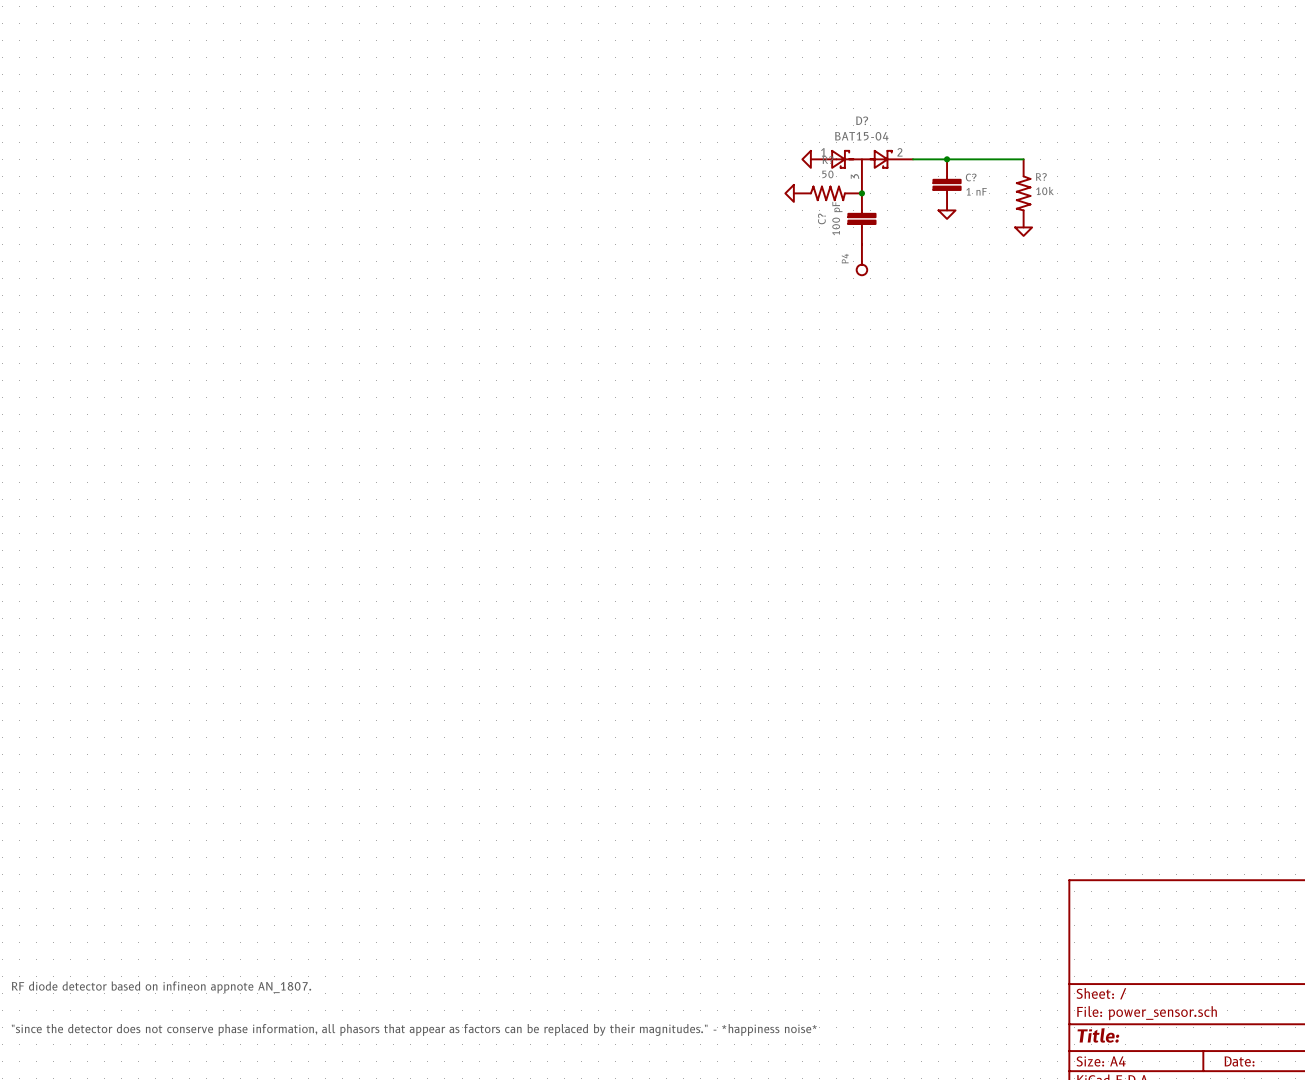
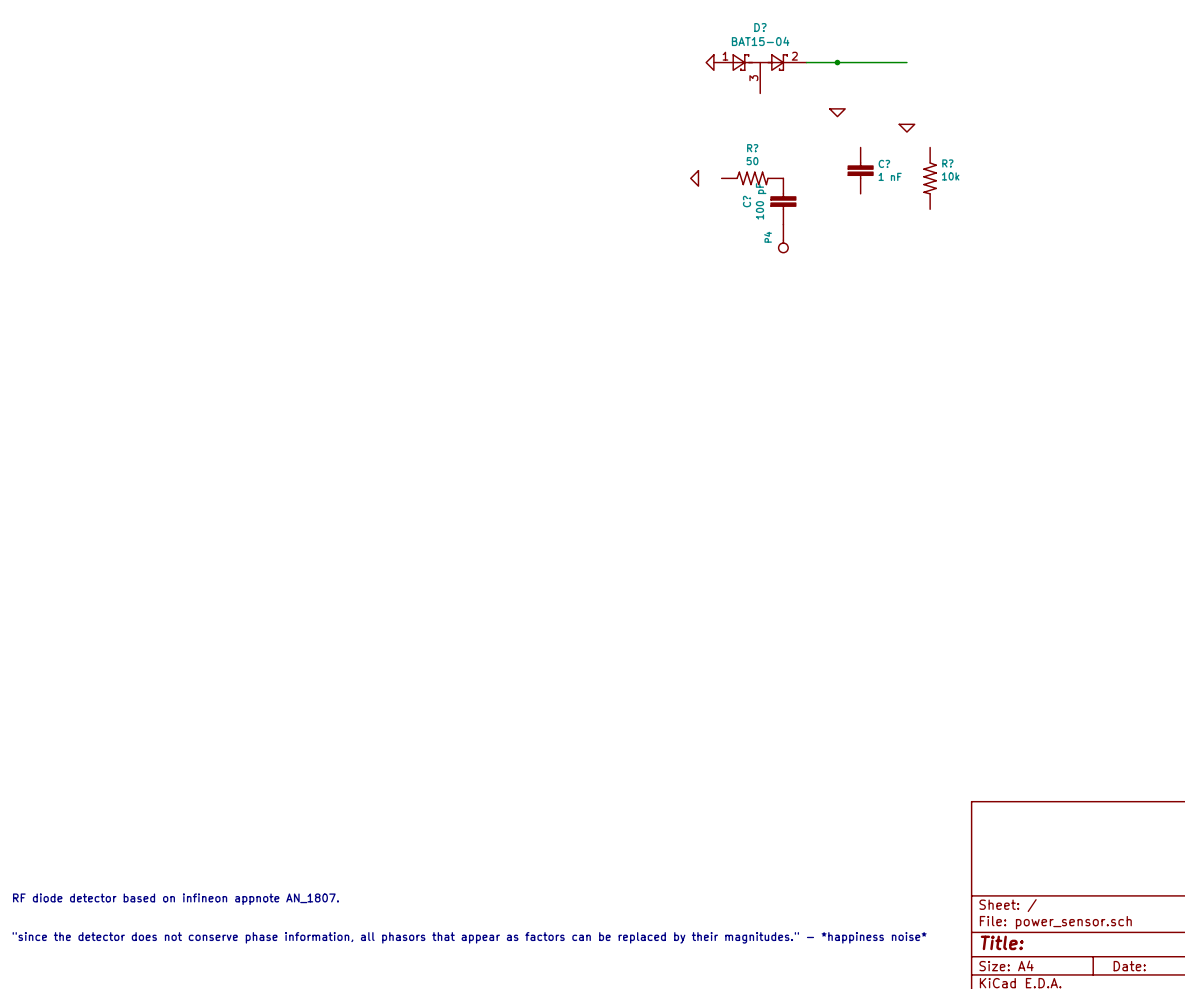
power symbol: none -> (710, 62)
junction: none -> (837, 62)
power symbol: none -> (837, 112)
power symbol: none -> (906, 128)
power symbol: (806, 159) -> none
wire: (913, 159) (1023, 159) -> (806, 62) (906, 62)
junction: (947, 159) -> none
D? position: (861, 172) -> (760, 74)
power symbol position: (789, 193) -> (694, 178)
junction: (861, 193) -> none
power symbol: (947, 214) -> none
power symbol: (1023, 231) -> none

